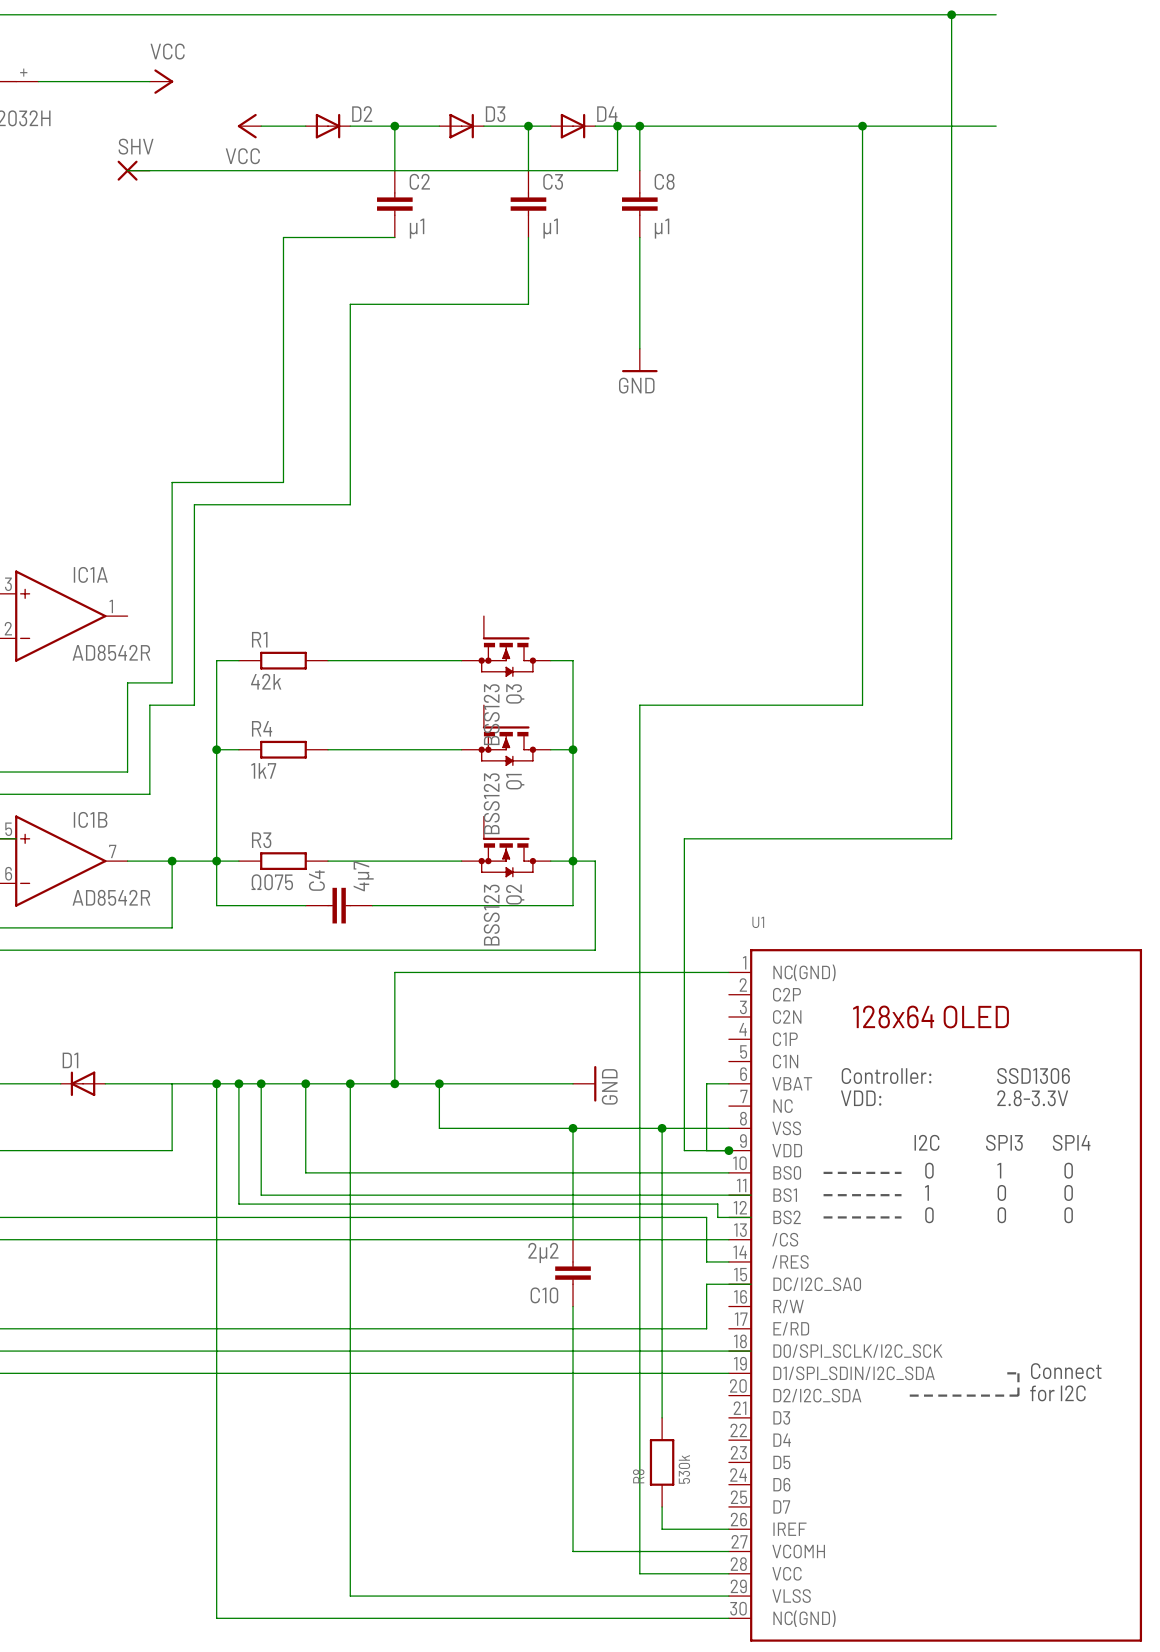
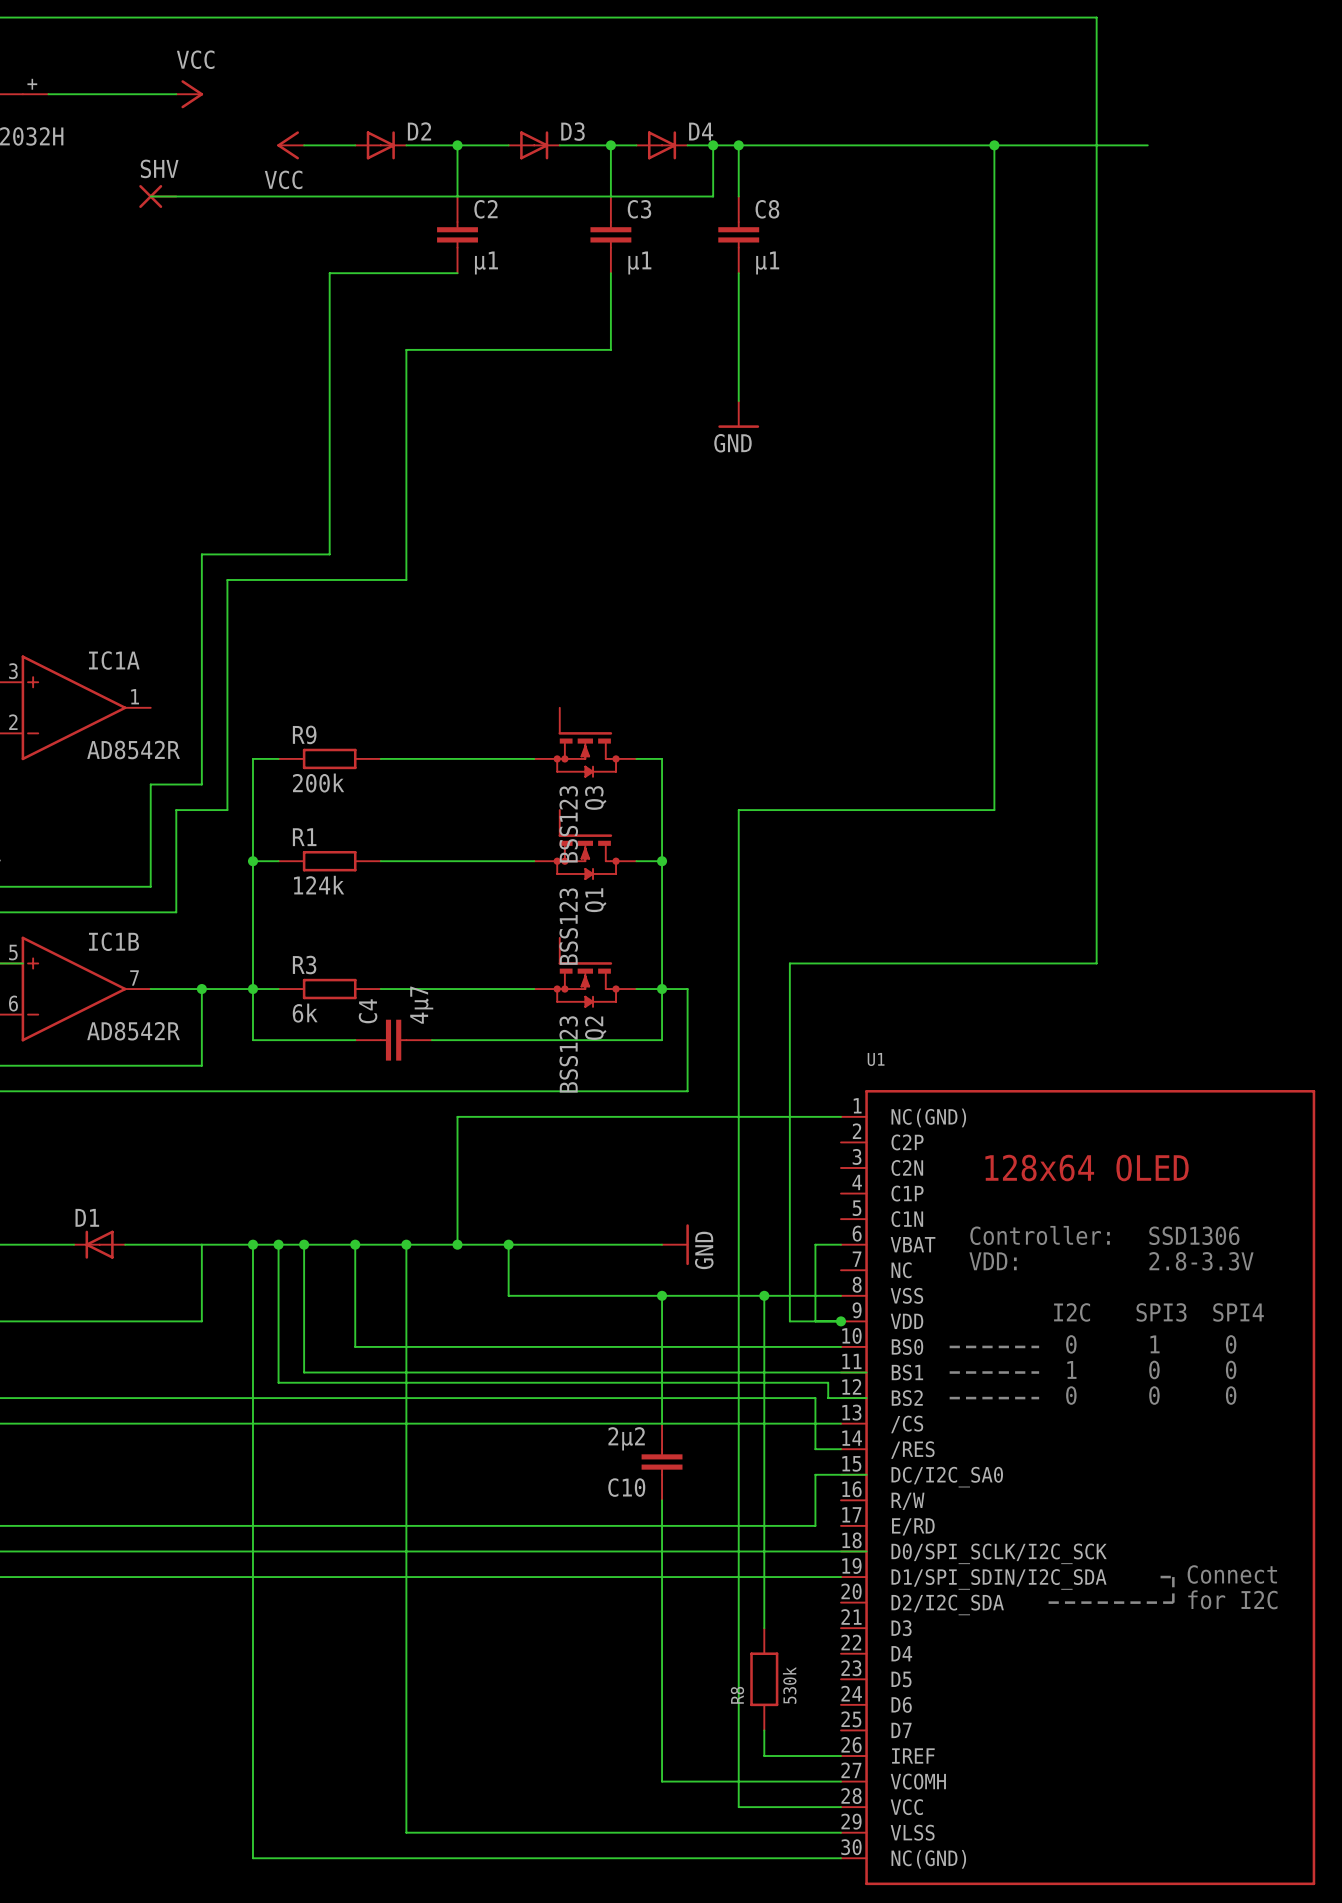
wire: (951, 14) (996, 14) -> none
junction: (951, 14) -> none
R1 name: R1 (259, 639) -> R9 (304, 734)
R1 value: 42k (266, 681) -> 200k (318, 783)
R4 name: R4 (262, 728) -> R1 (304, 837)
R4 value: 1k7 (263, 770) -> 124k (319, 885)
R3 value: Ω075 (272, 882) -> 6k (305, 1013)

